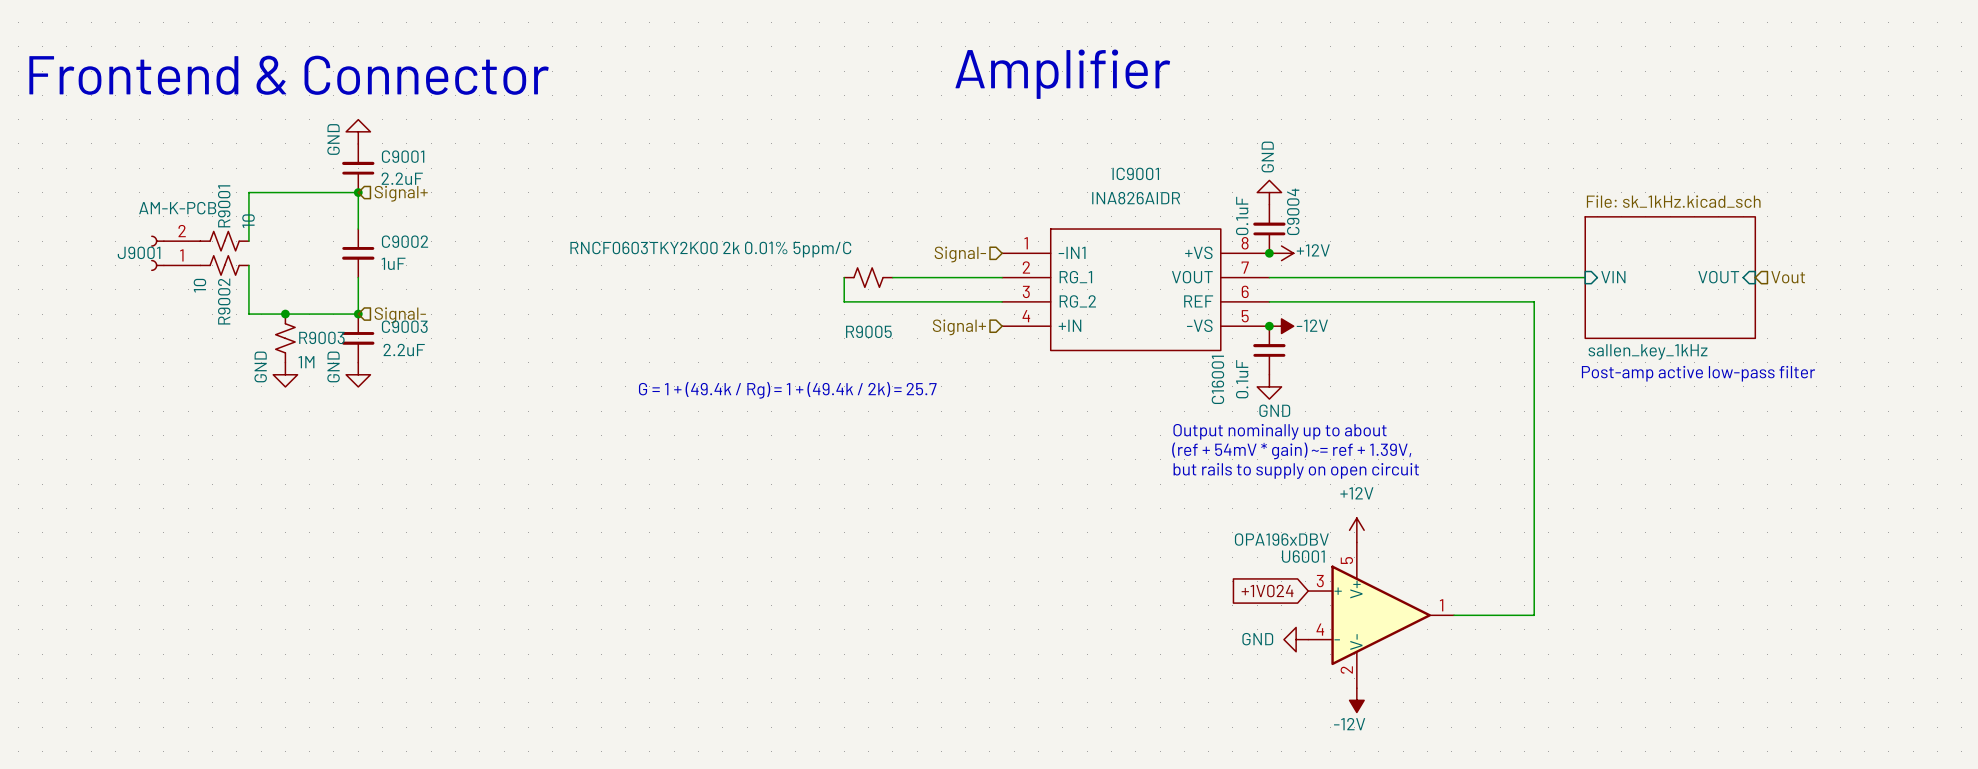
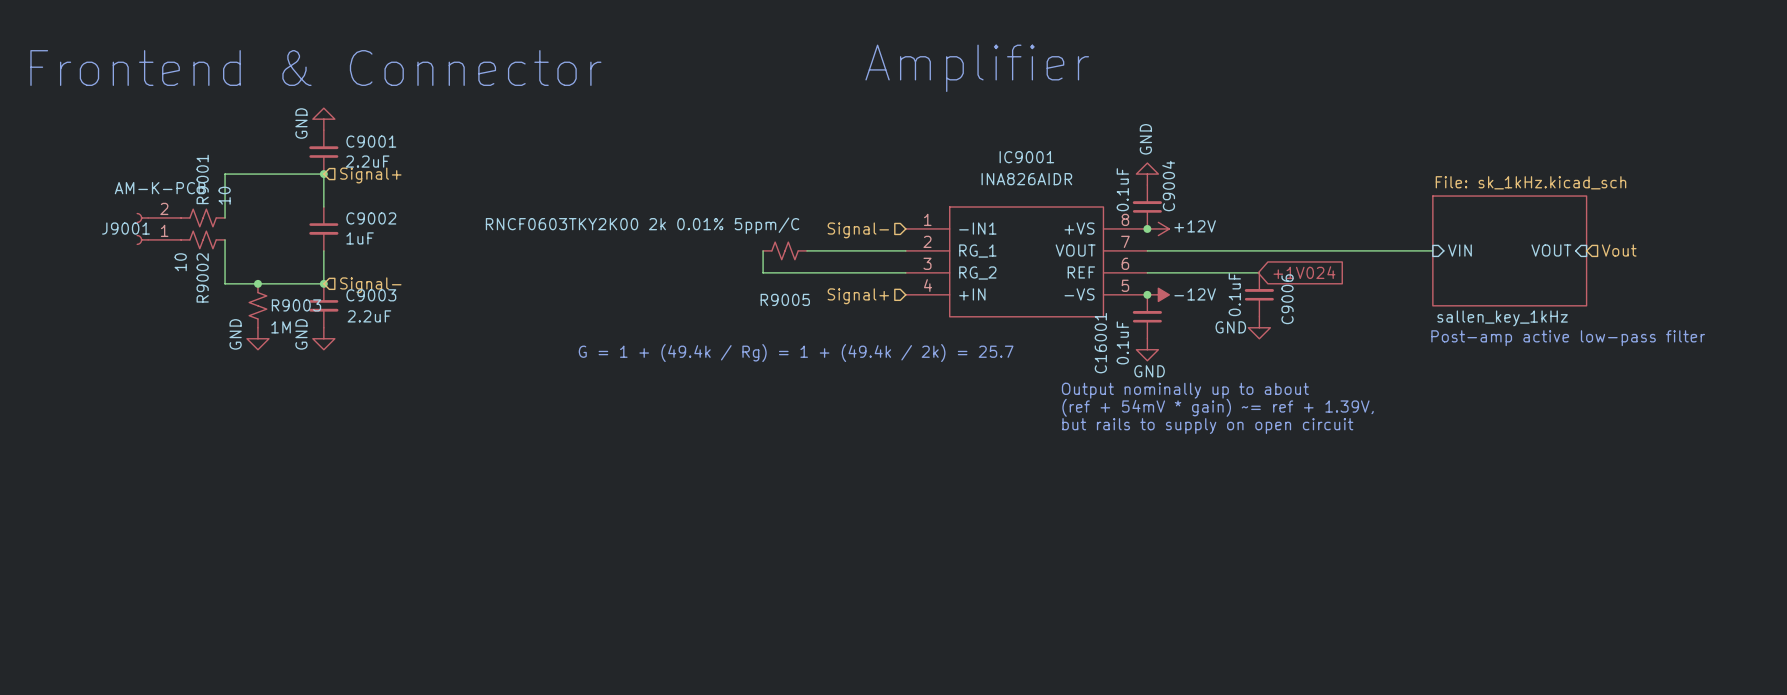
wire: (1393, 301) (1534, 301) (1534, 615) (1454, 615) -> none
global label: none -> +1V024 (1304, 272)
C9006: none -> 0.1uF (1259, 294)
power symbol: none -> GND (1259, 327)
power symbol: +12V (1356, 530) -> none
global label: +1V024 (1267, 591) -> none
U6001: OPA196xDBV (1381, 615) -> none
power symbol: GND (1296, 639) -> none
power symbol: -12V (1356, 700) -> none

